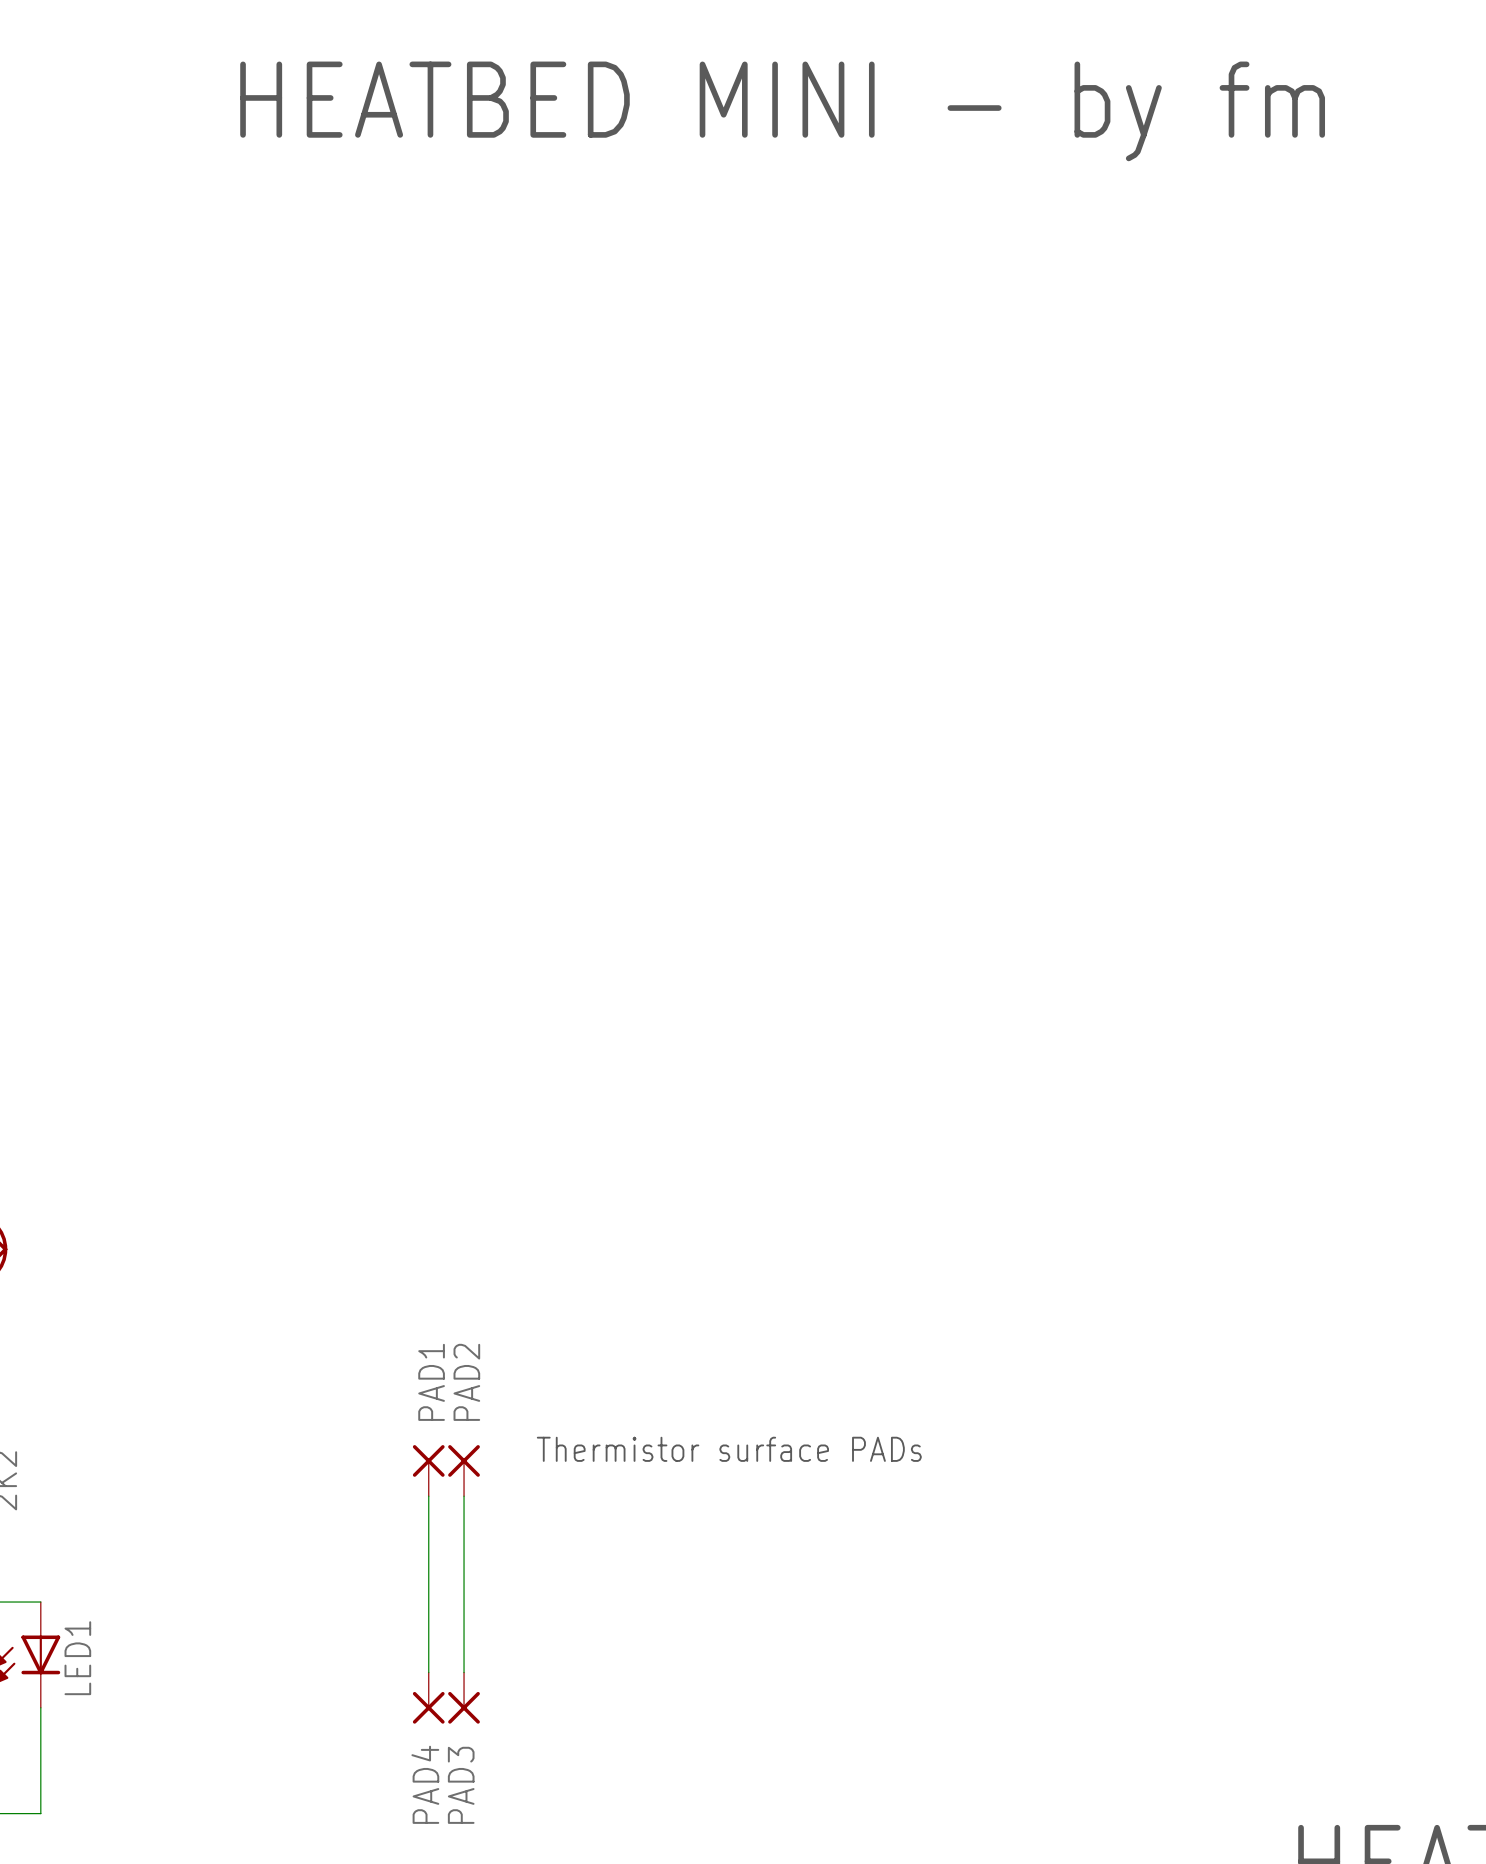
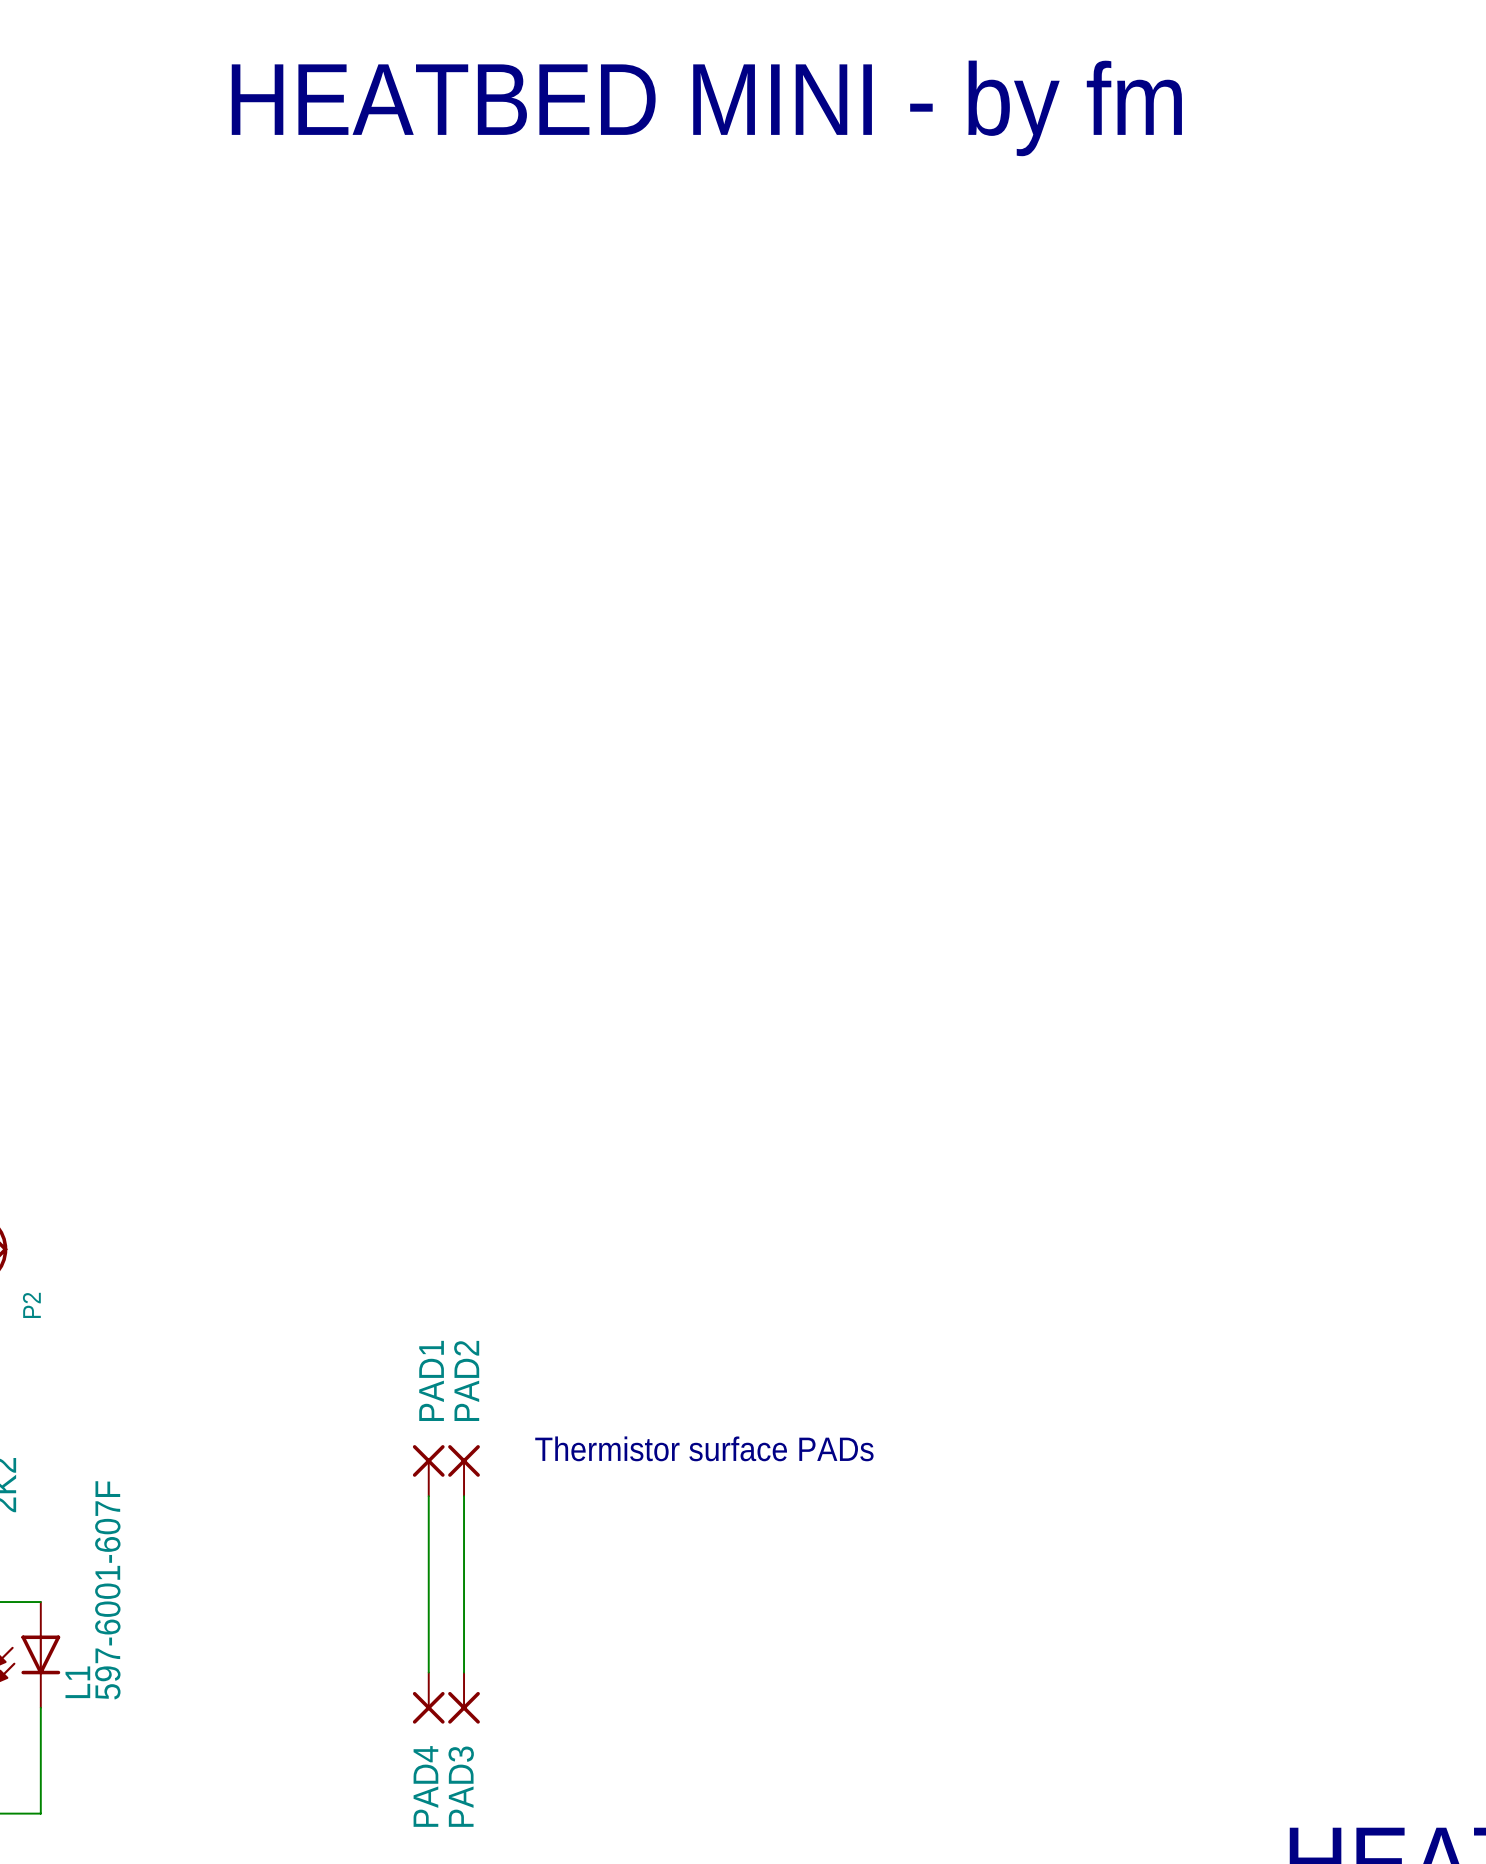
P2 name: none -> P2 (31, 1305)
LED1 value: none -> 597-6001-607F (107, 1590)
LED1 name: LED1 (77, 1658) -> L1 (77, 1682)

